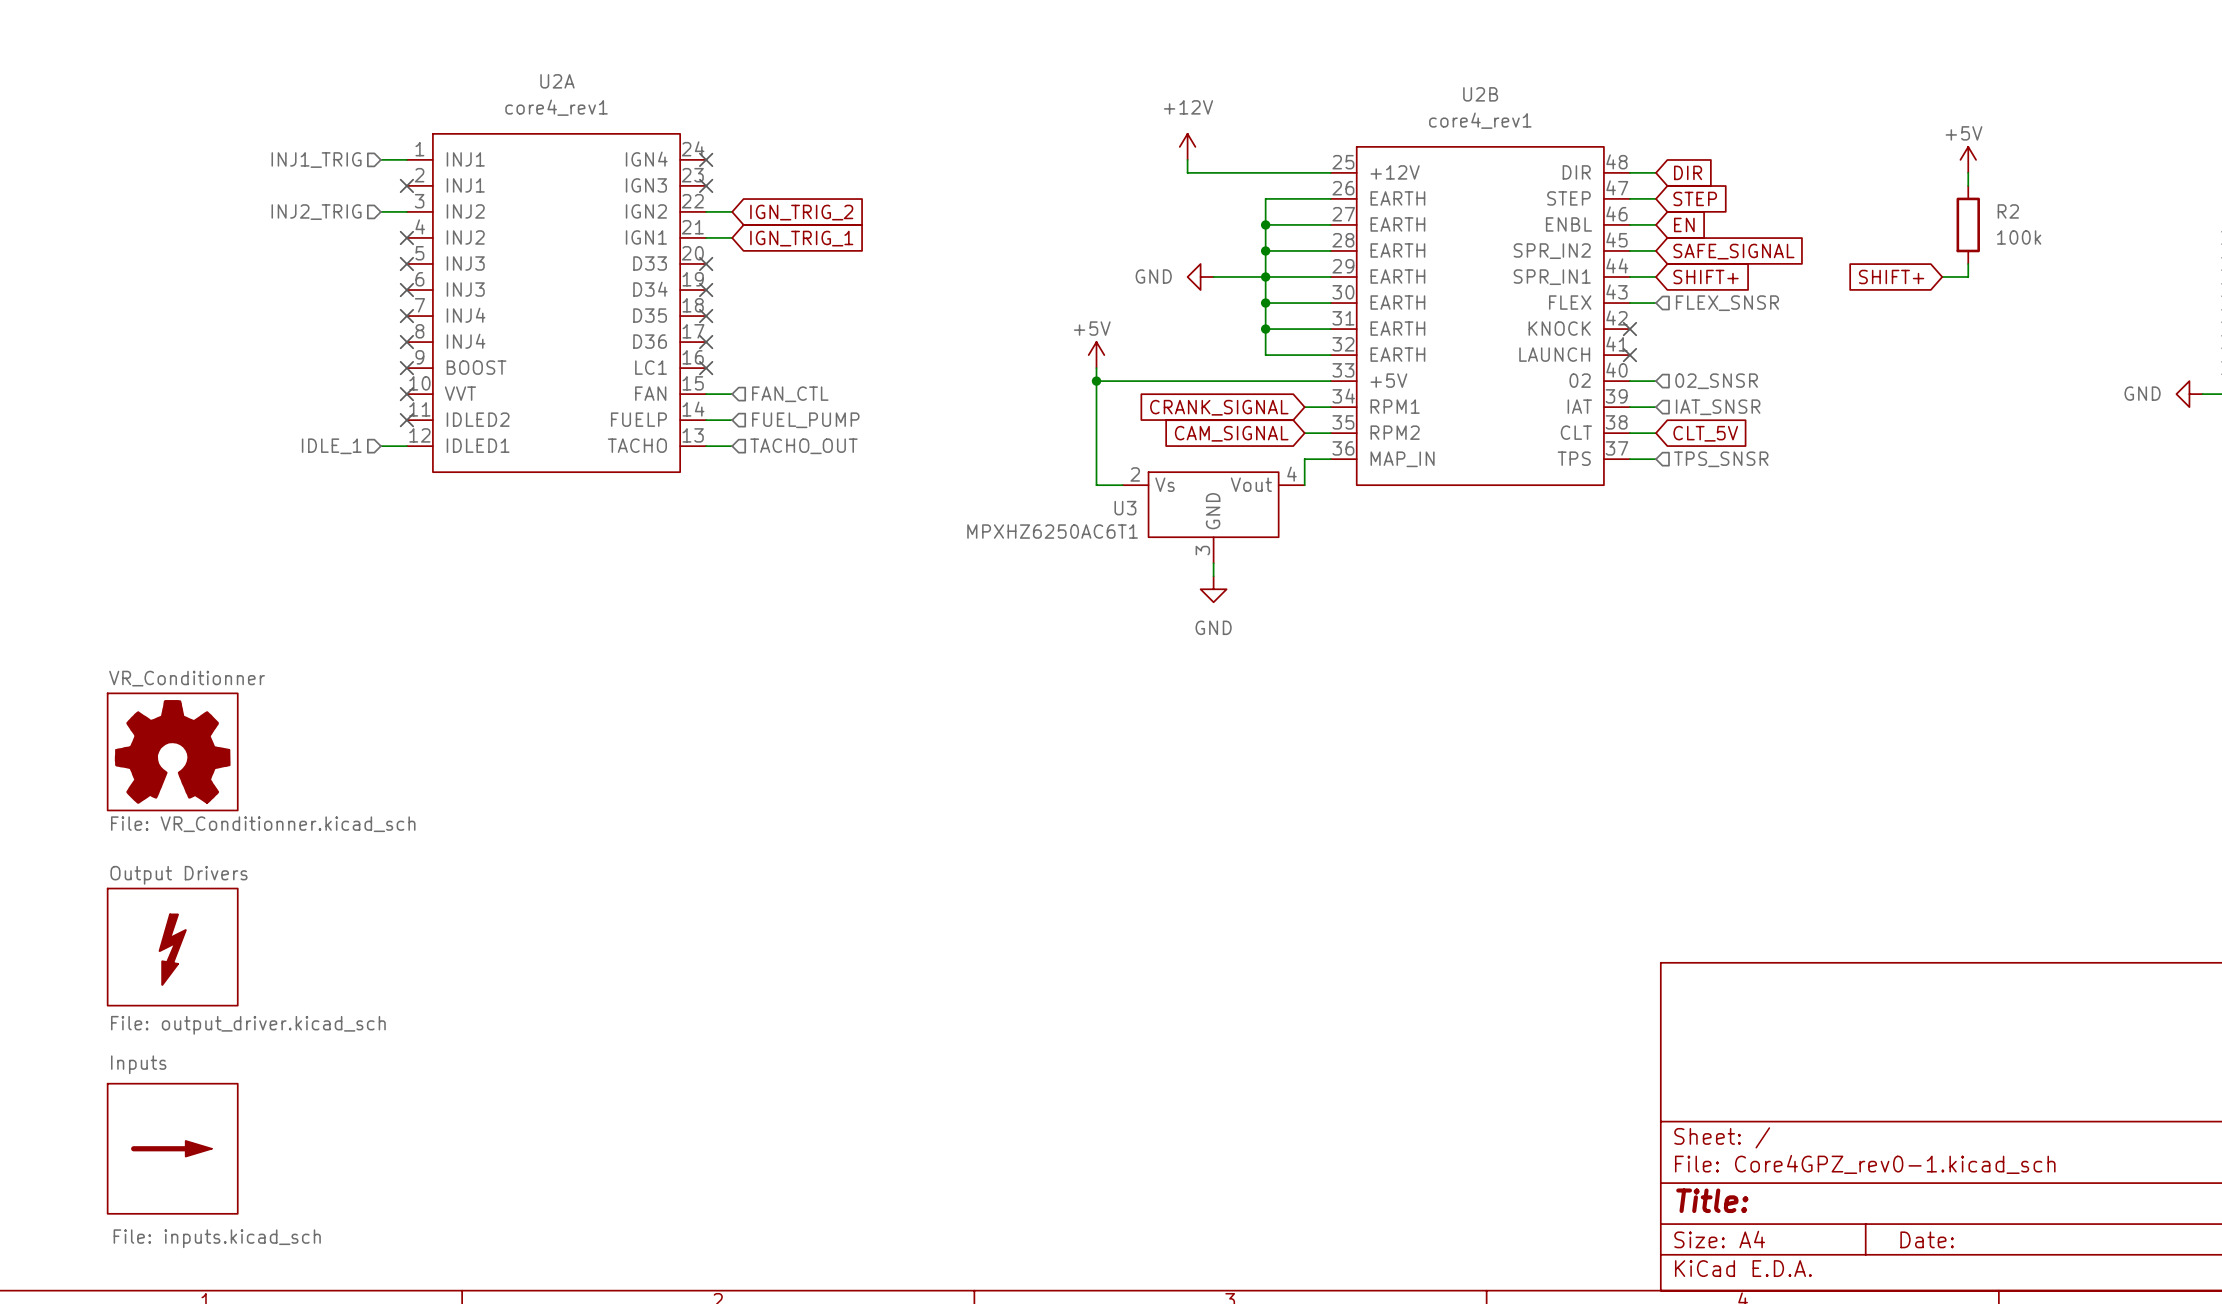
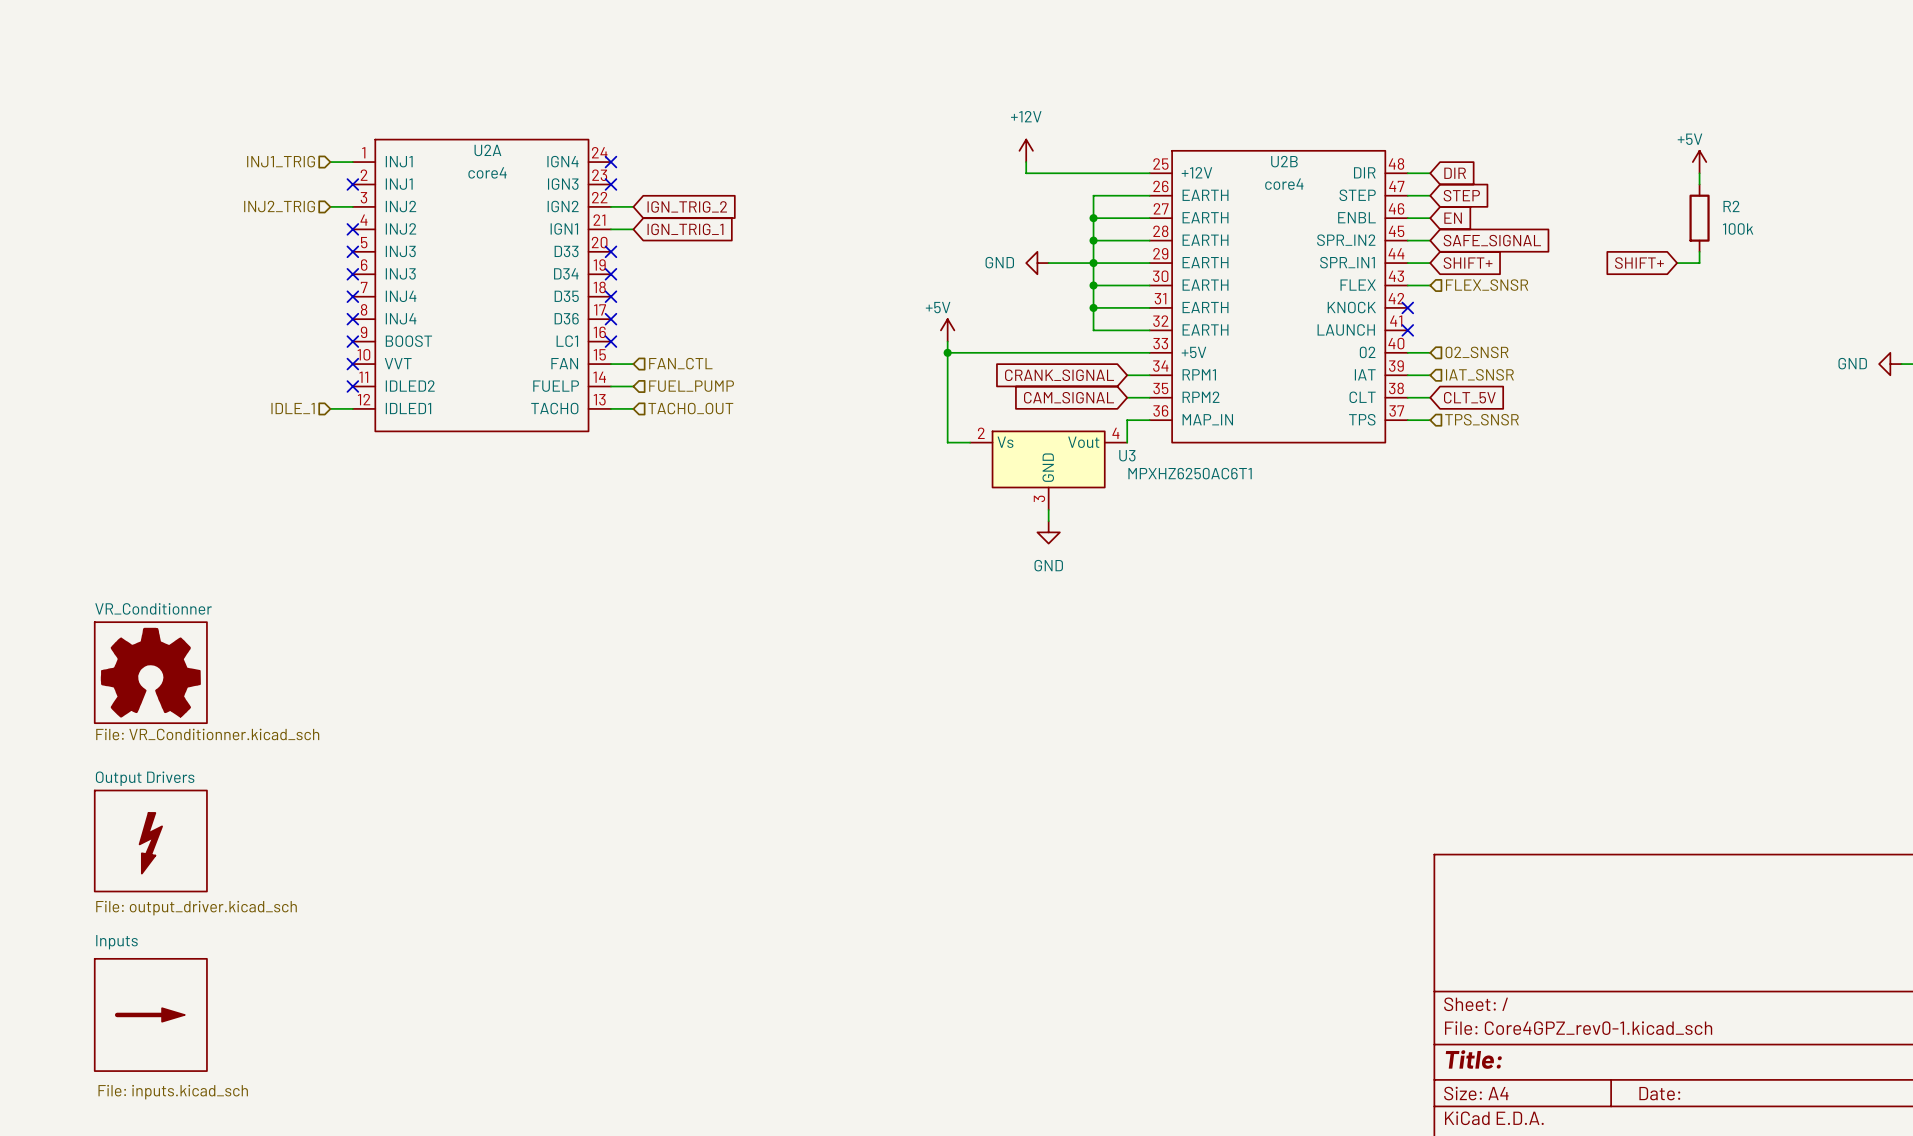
U2A name position: U2A (557, 81) -> U2A (487, 150)
U2B name position: U2B (1480, 94) -> U2B (1284, 161)
U2A value: core4_rev1 (556, 107) -> core4 (487, 172)
U2B value: core4_rev1 (1480, 120) -> core4 (1284, 184)
U3 name position: U3 (1125, 508) -> U3 (1127, 455)
U3 value position: MPXHZ6250AC6T1 (1052, 531) -> MPXHZ6250AC6T1 (1190, 473)

